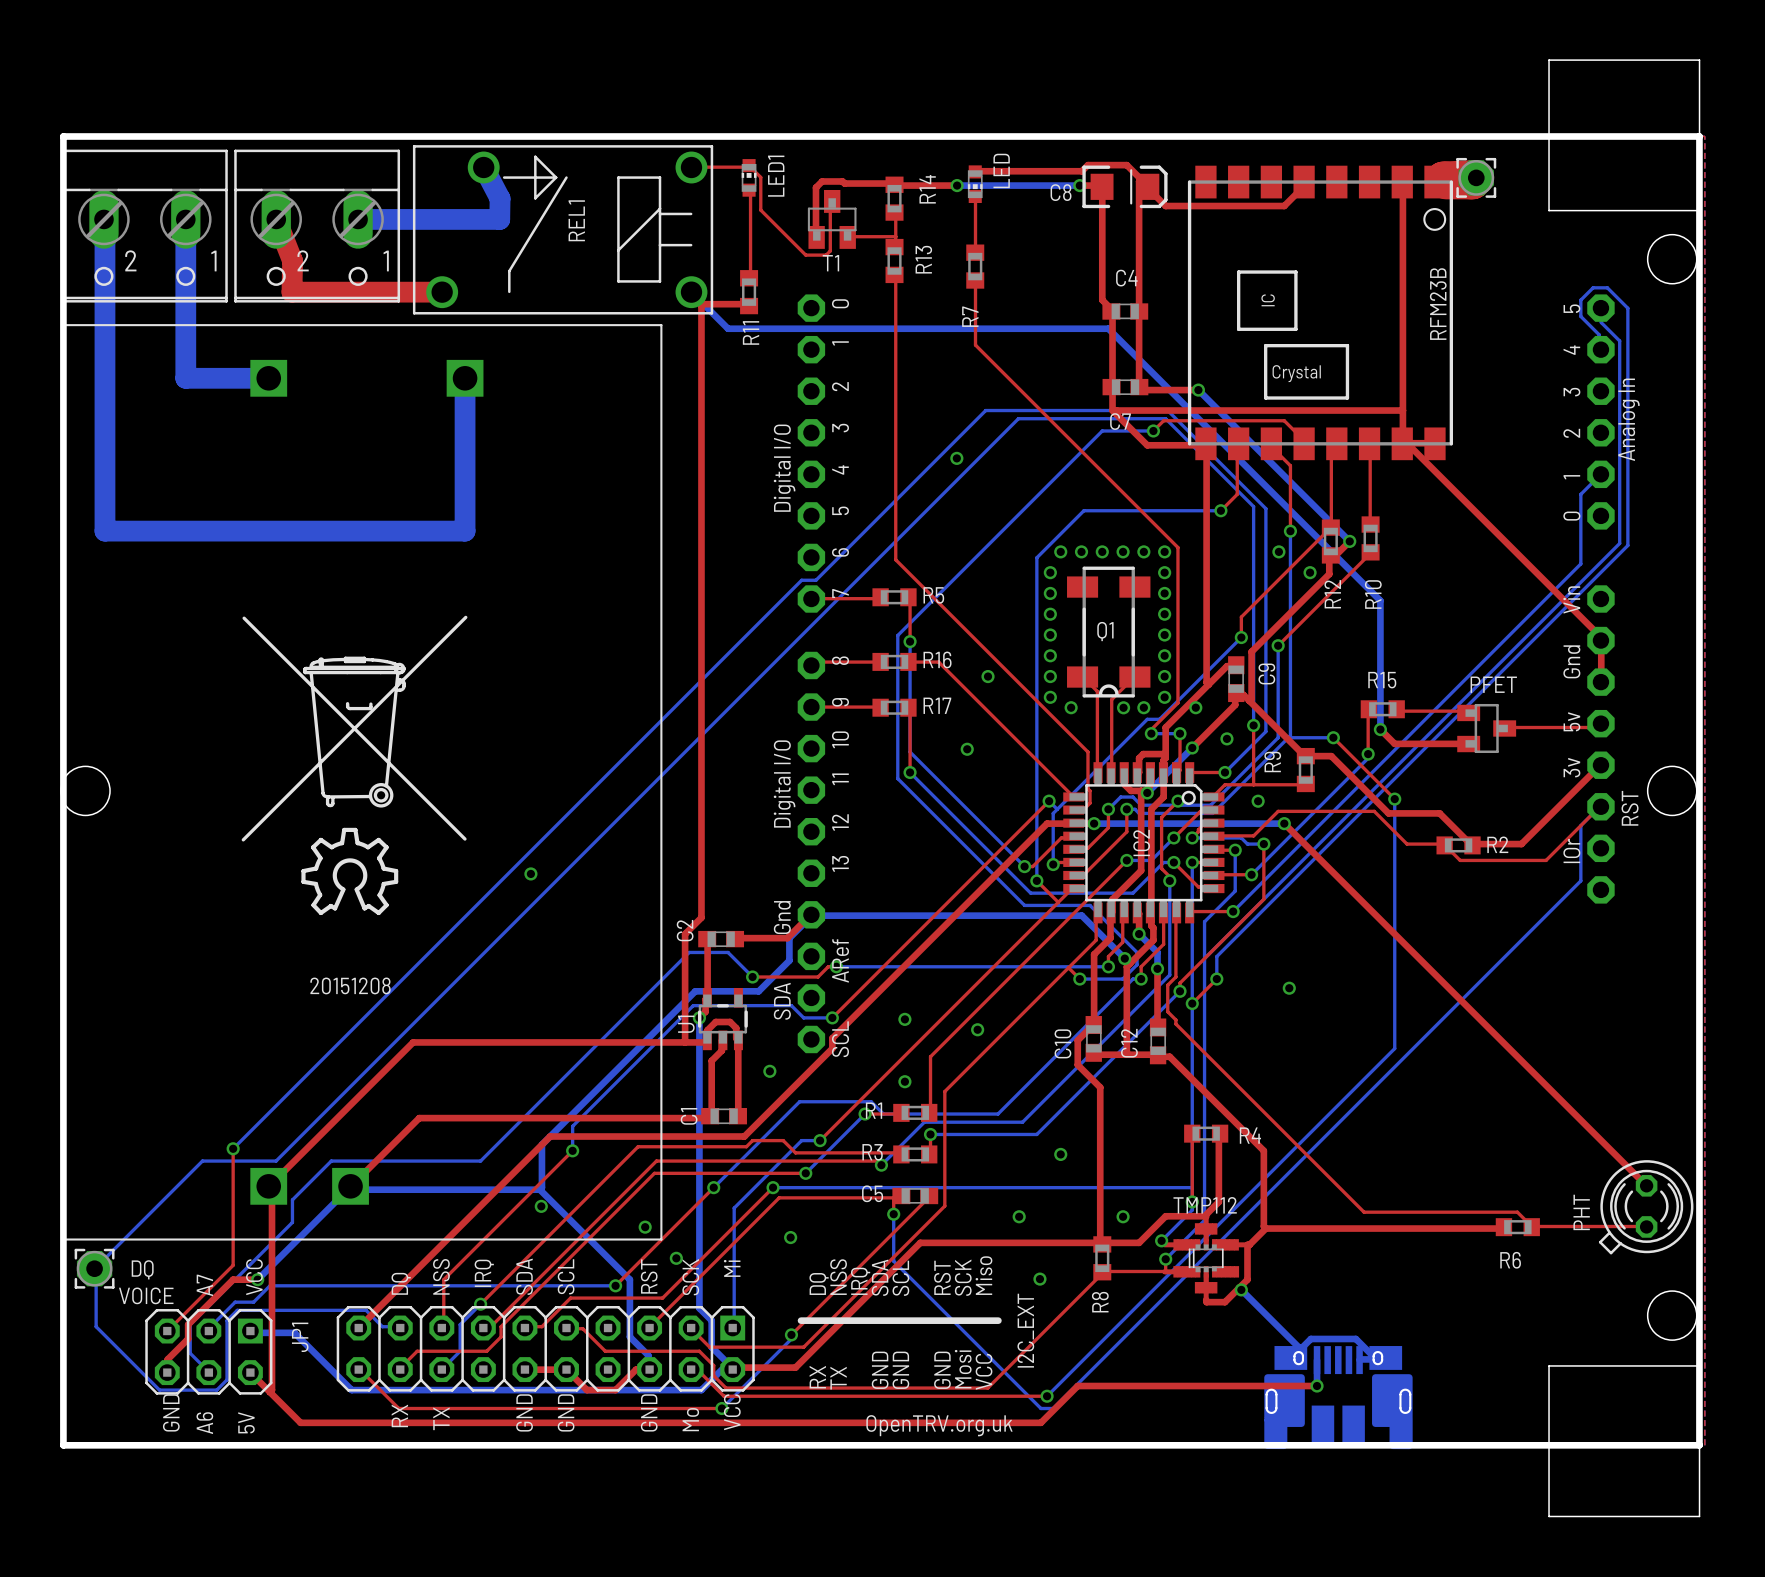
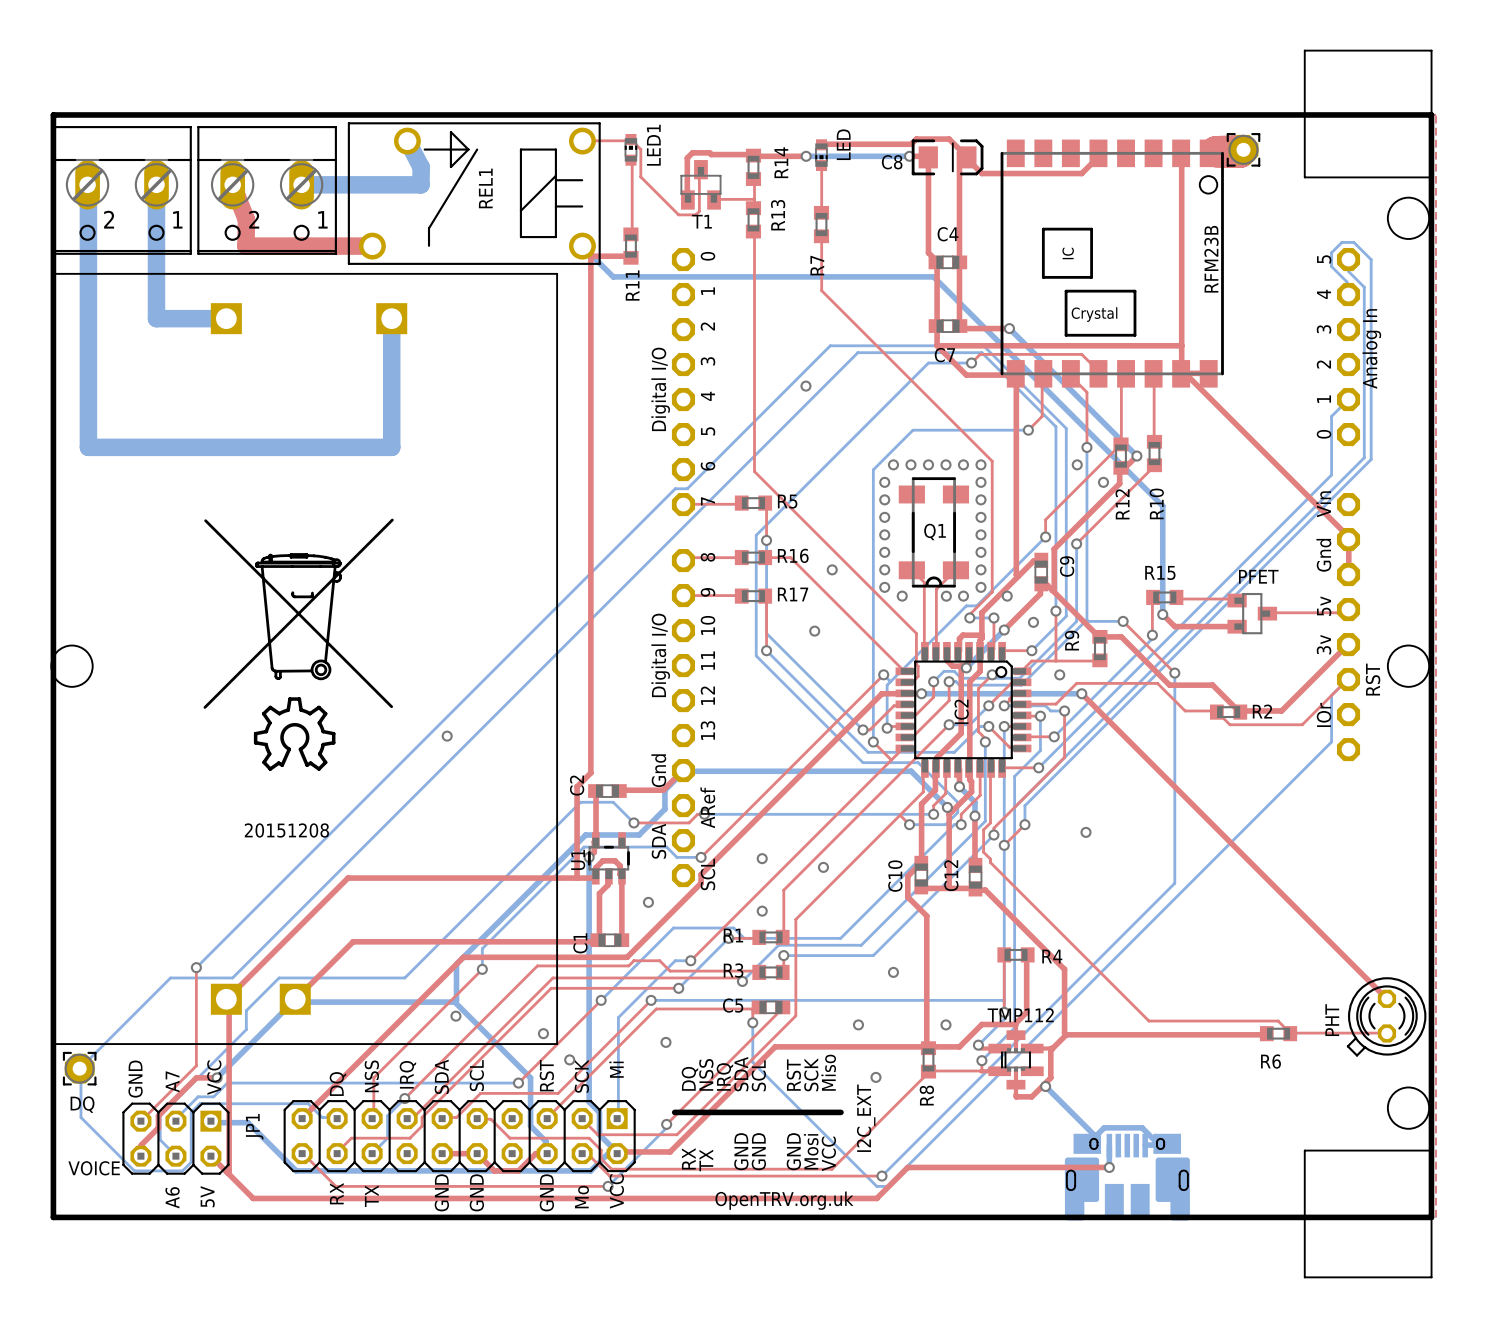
DQ name position: DQ (142, 1269) -> DQ (82, 1104)
text position: VOICE (146, 1295) -> VOICE (94, 1168)
text position: GND (171, 1412) -> GND (135, 1079)

